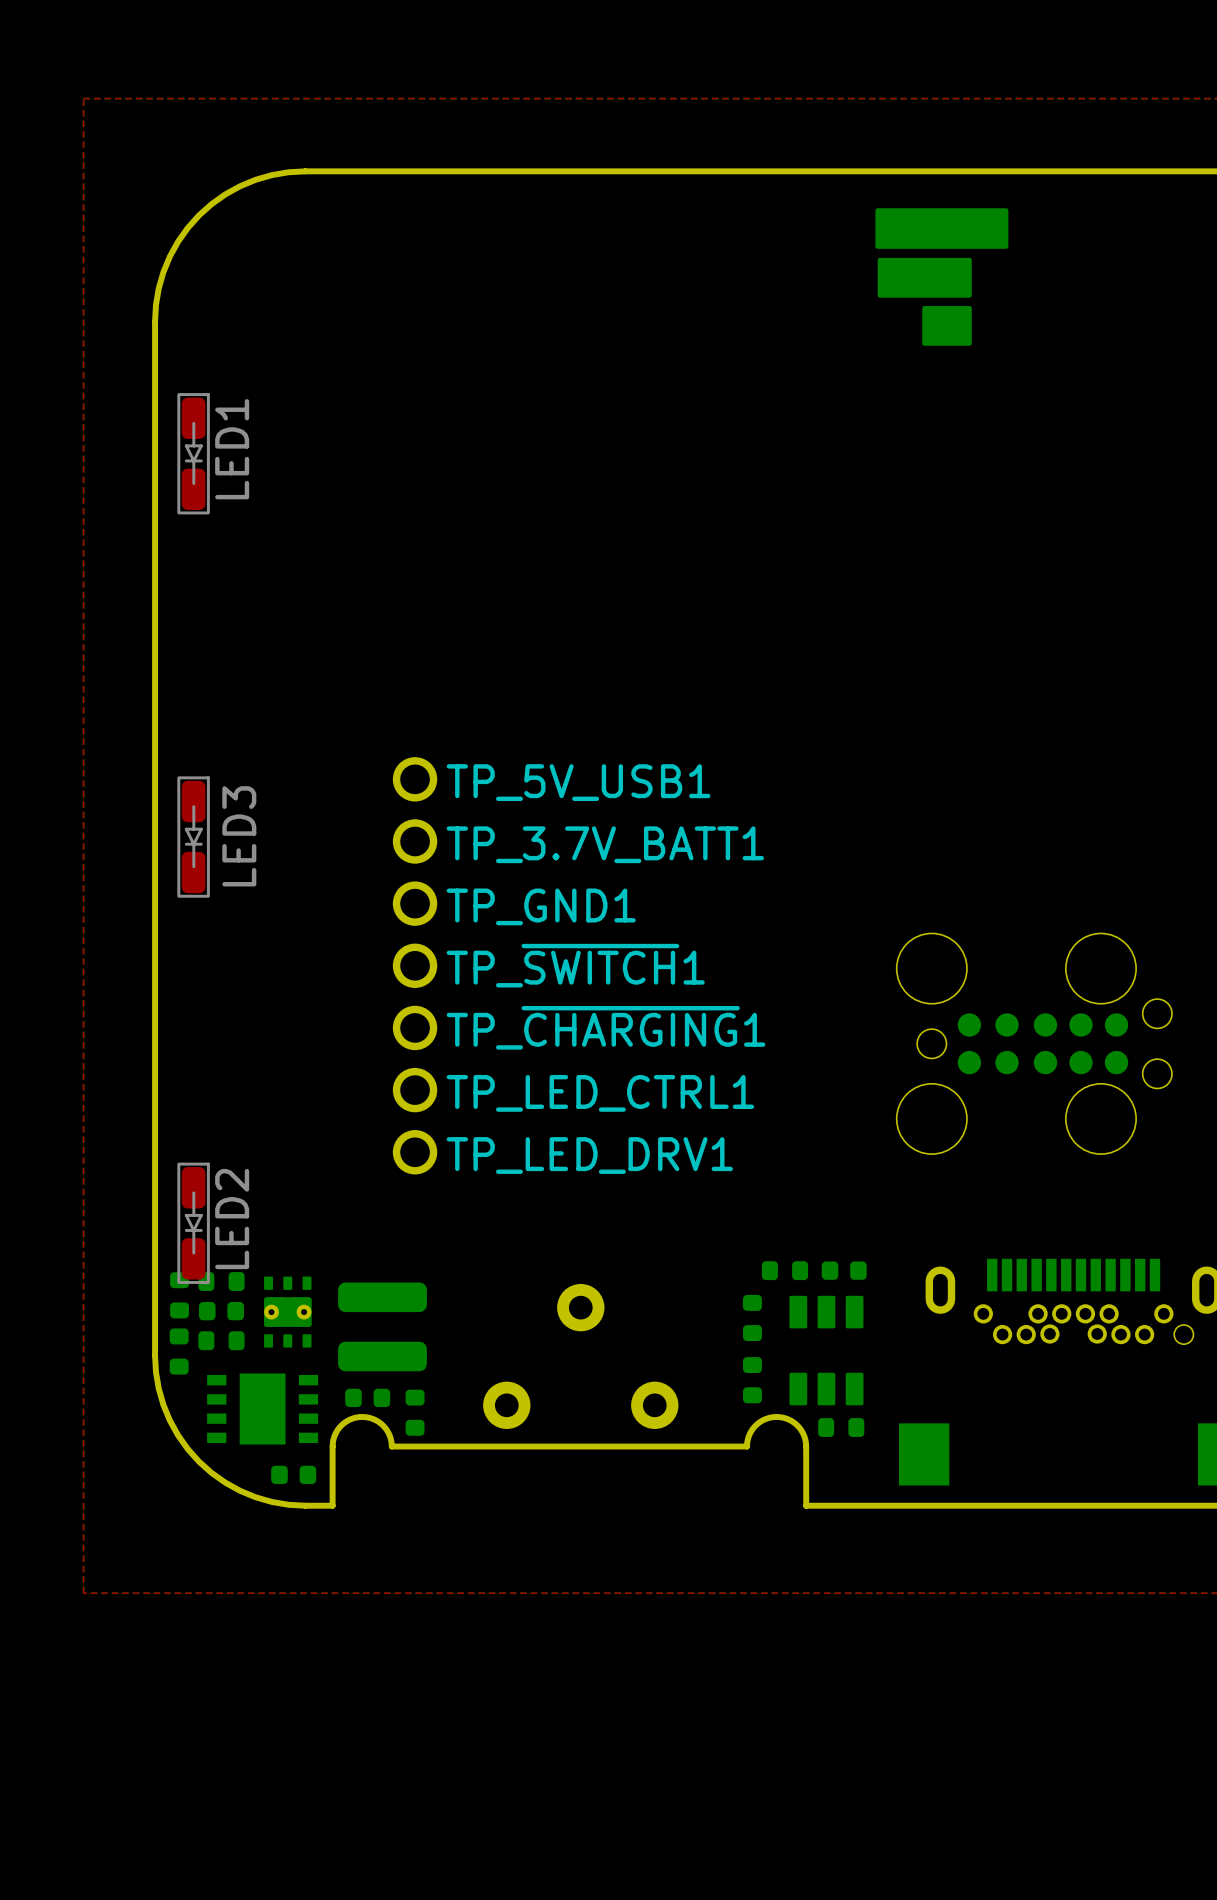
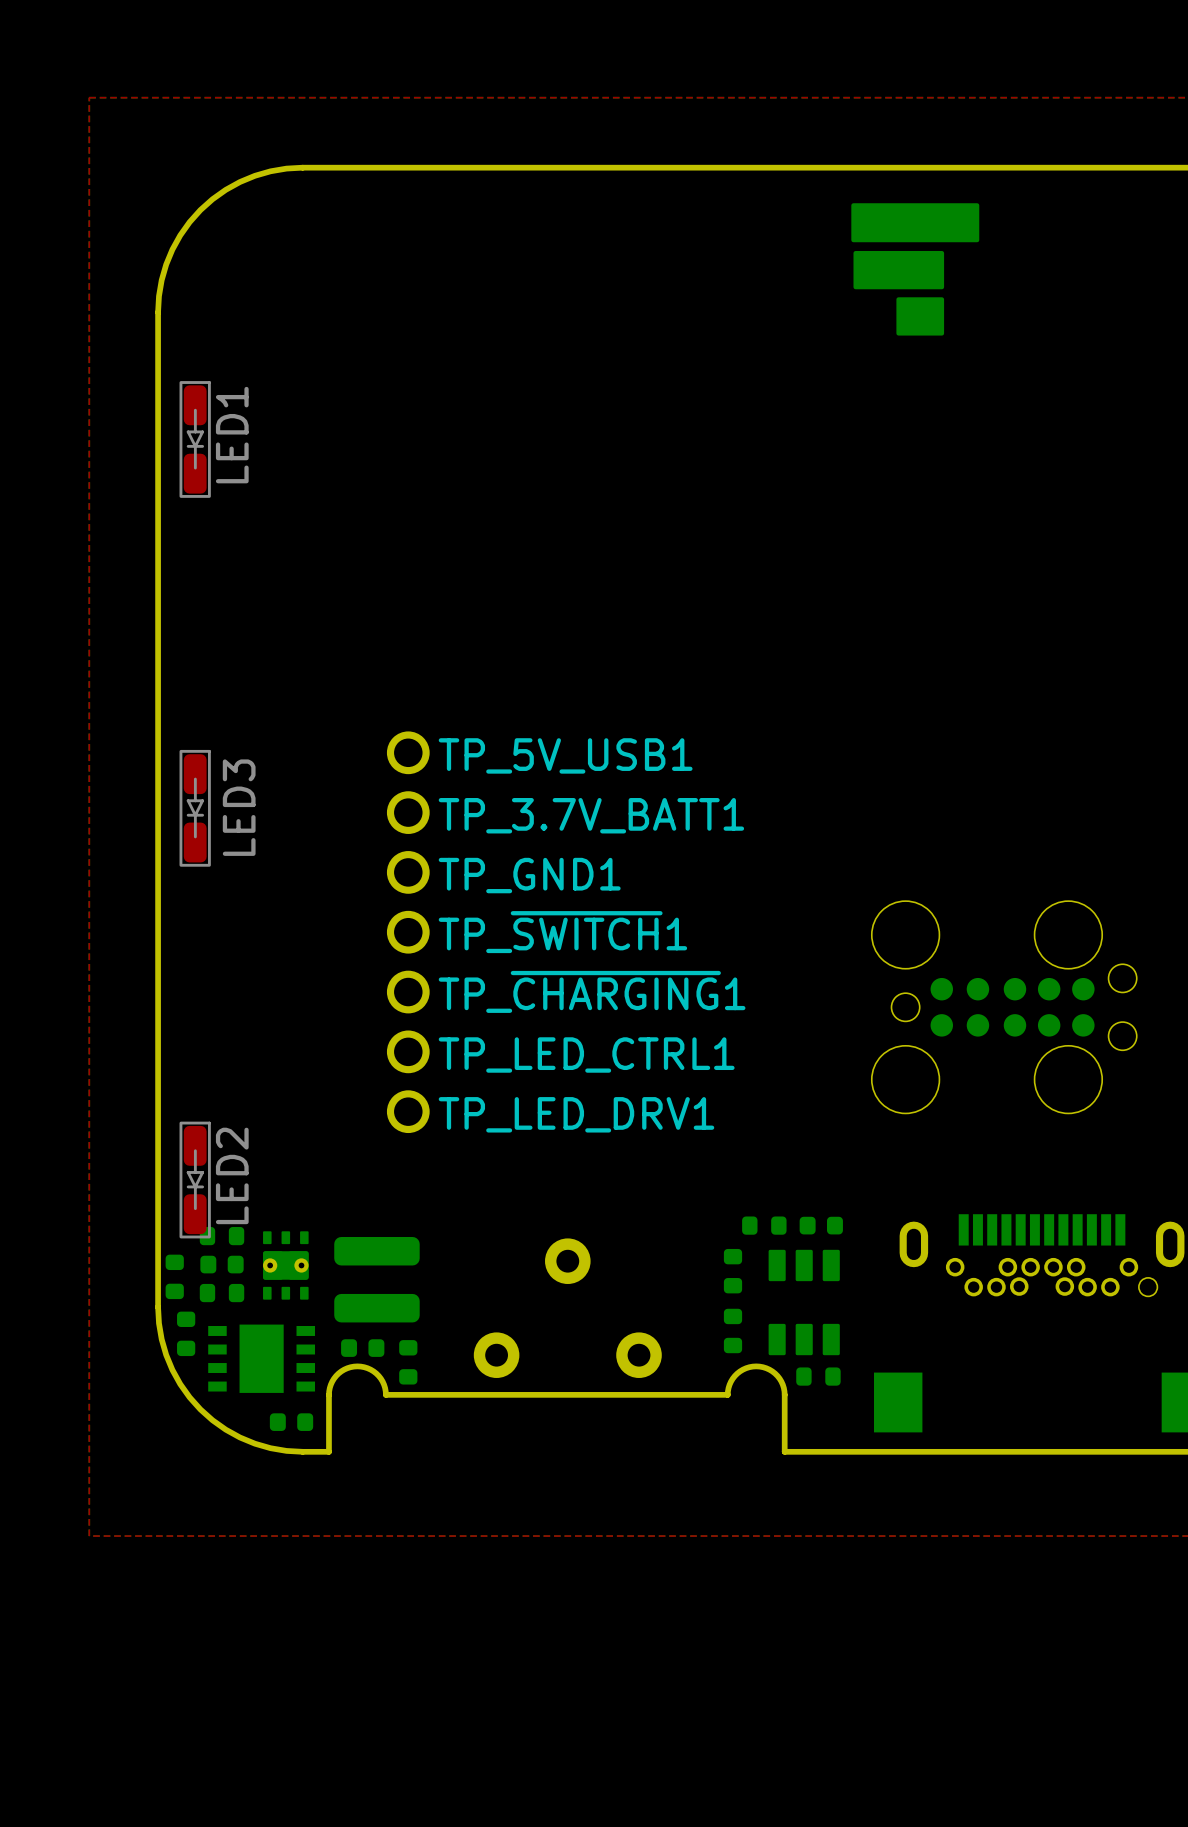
part: (179, 1295) -> none
part: none -> (174, 1276)
part: (179, 1351) -> none
part: none -> (186, 1333)

